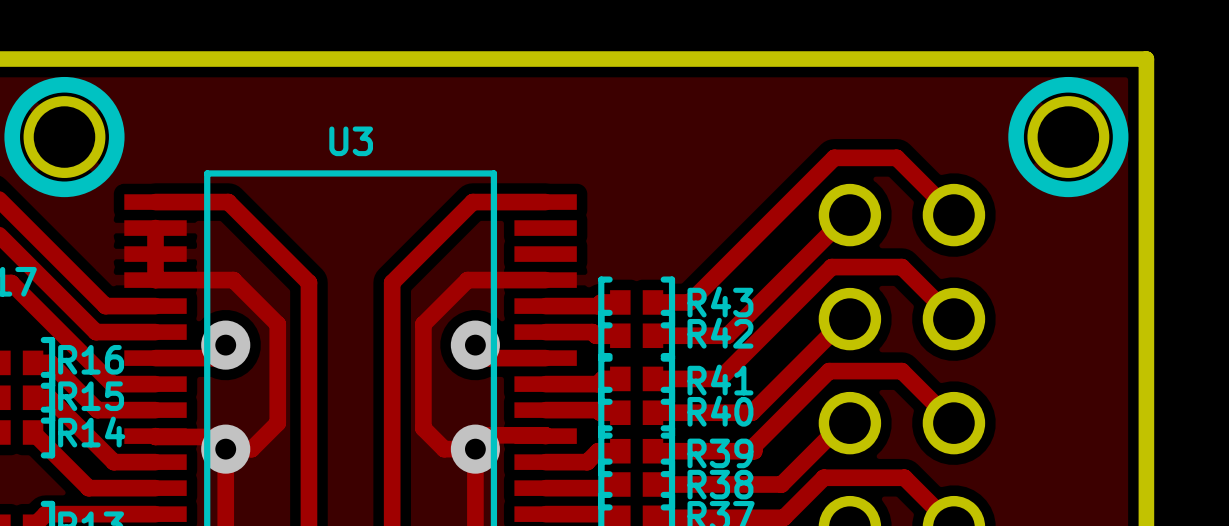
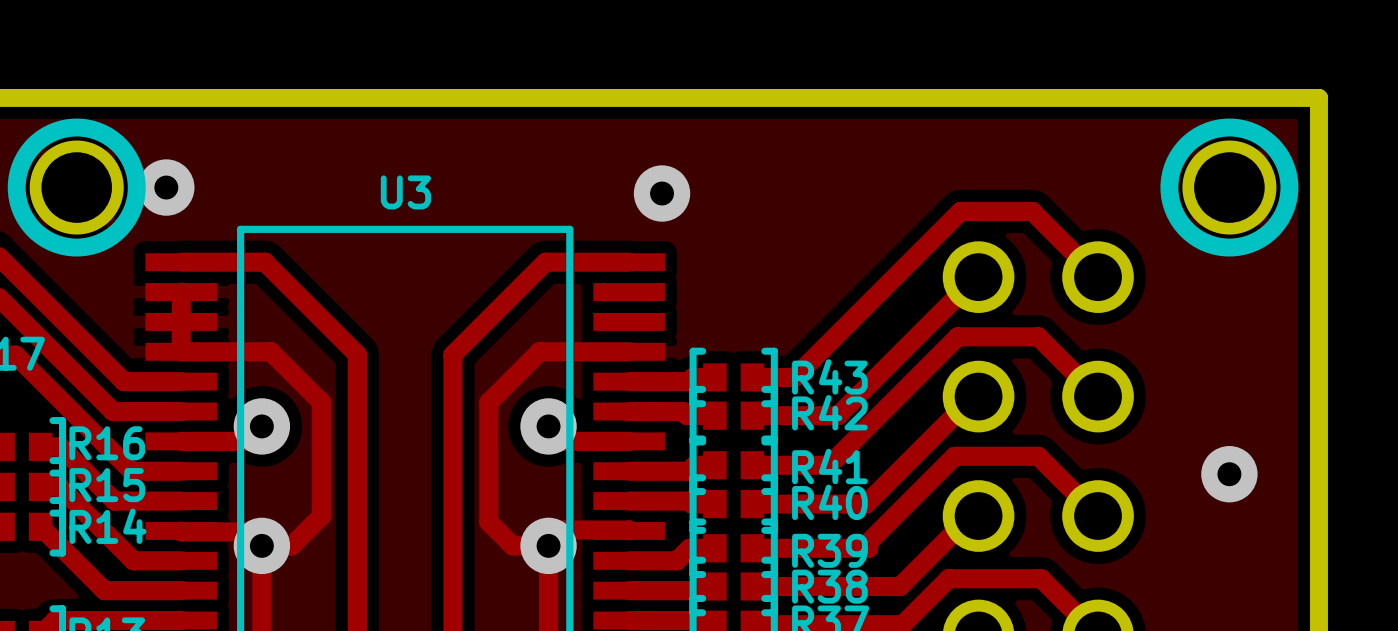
via: none -> (166, 187)
via: none -> (662, 193)
via: none -> (1229, 474)

